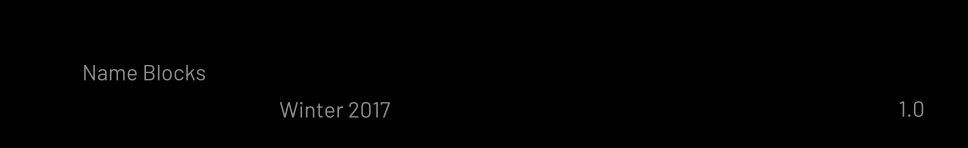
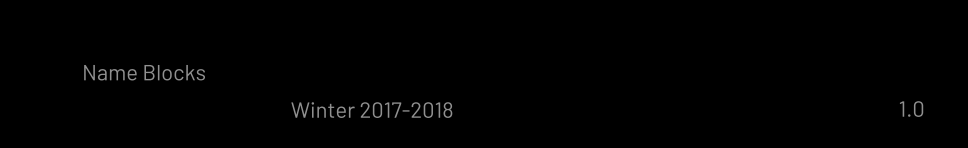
text: Winter 2017 (334, 109) -> Winter 2017-2018 (371, 110)

